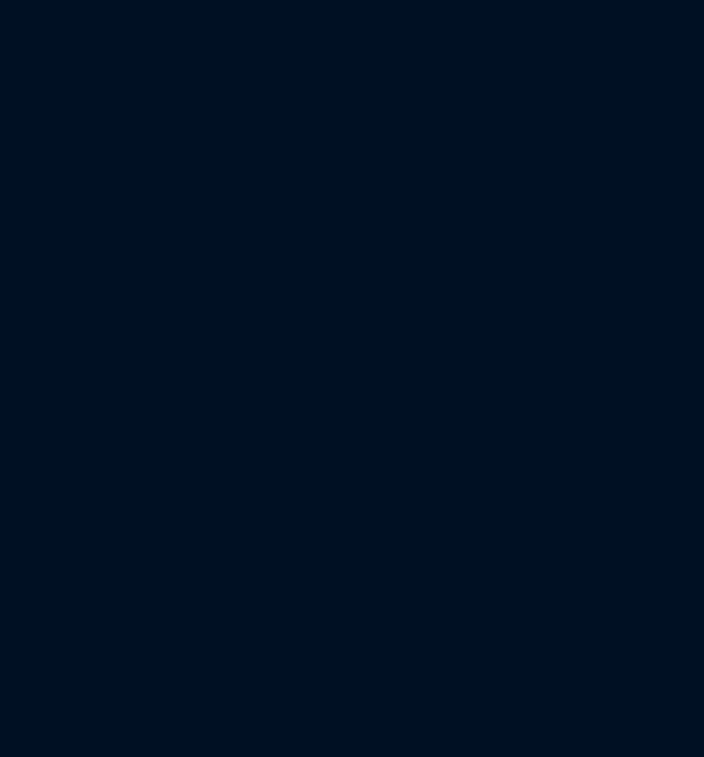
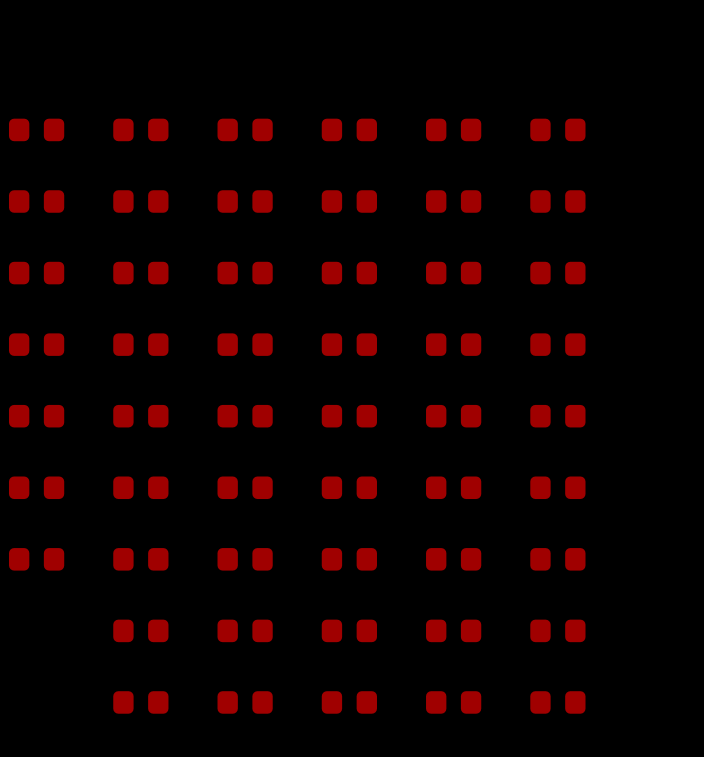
part: none -> (36, 129)
part: none -> (140, 129)
part: none -> (245, 129)
part: none -> (349, 129)
part: none -> (453, 129)
part: none -> (557, 129)
part: none -> (36, 201)
part: none -> (140, 201)
part: none -> (245, 201)
part: none -> (349, 201)
part: none -> (453, 201)
part: none -> (557, 201)
part: none -> (36, 273)
part: none -> (140, 273)
part: none -> (245, 273)
part: none -> (349, 273)
part: none -> (453, 273)
part: none -> (557, 273)
part: none -> (36, 344)
part: none -> (140, 344)
part: none -> (245, 344)
part: none -> (349, 344)
part: none -> (453, 344)
part: none -> (557, 344)
part: none -> (36, 416)
part: none -> (140, 416)
part: none -> (245, 416)
part: none -> (349, 416)
part: none -> (453, 416)
part: none -> (557, 416)
part: none -> (36, 487)
part: none -> (140, 487)
part: none -> (245, 487)
part: none -> (349, 487)
part: none -> (453, 487)
part: none -> (557, 487)
part: none -> (36, 559)
part: none -> (140, 559)
part: none -> (245, 559)
part: none -> (349, 559)
part: none -> (453, 559)
part: none -> (557, 559)
part: none -> (140, 630)
part: none -> (245, 630)
part: none -> (349, 630)
part: none -> (453, 630)
part: none -> (557, 630)
part: none -> (140, 702)
part: none -> (245, 702)
part: none -> (349, 702)
part: none -> (453, 702)
part: none -> (557, 702)

